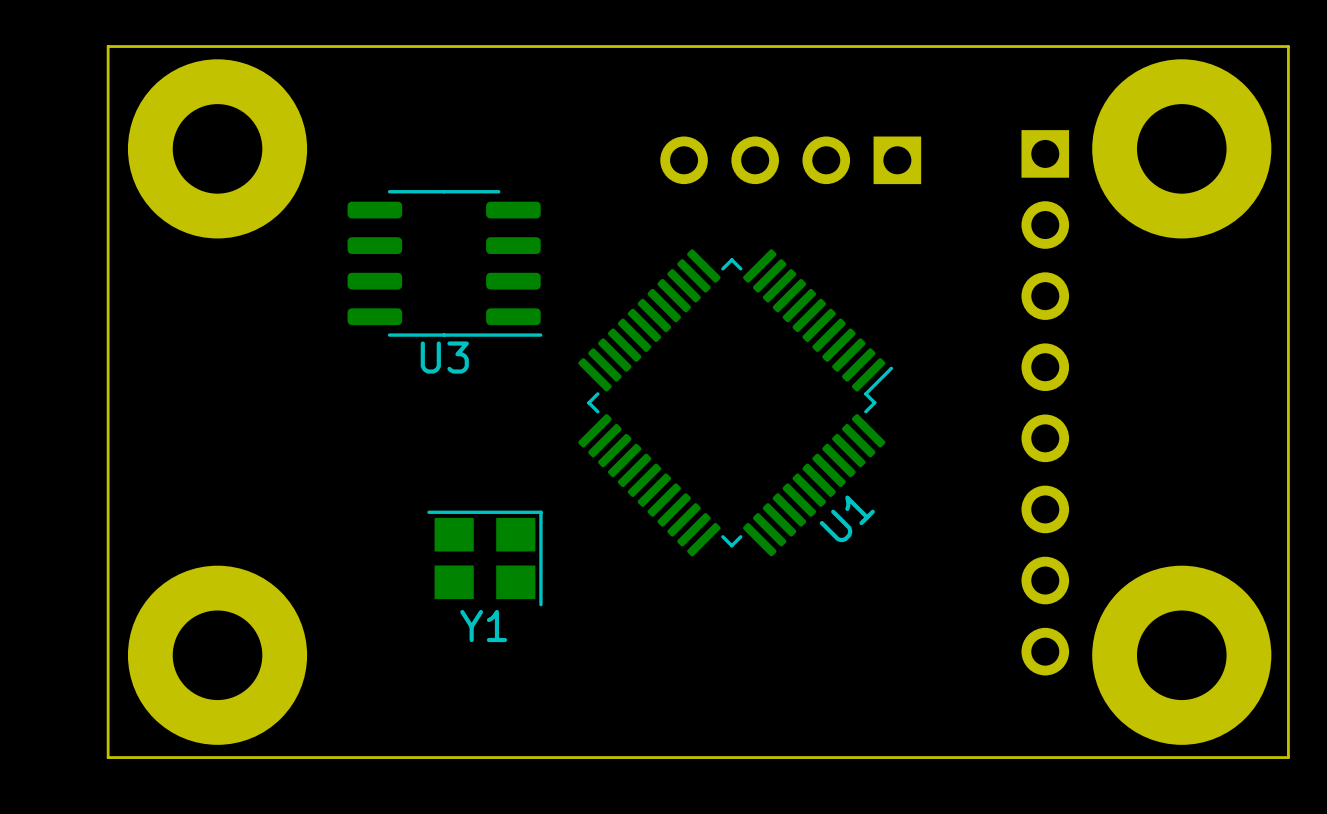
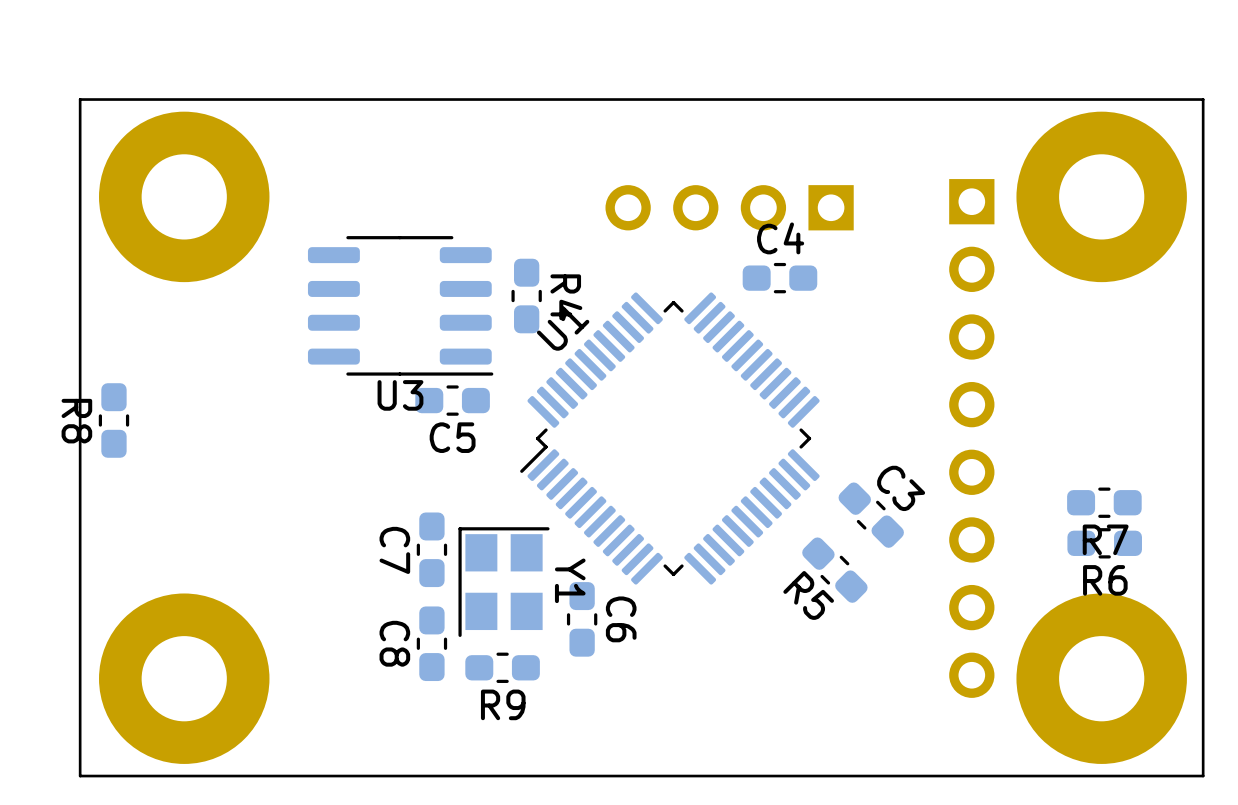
C4: none -> (779, 278)
R4: none -> (526, 296)
C5: none -> (452, 400)
R8: none -> (113, 420)
U1 rotation: 0° (735, 402) -> 180° (669, 438)
R7: none -> (1104, 502)
C3: none -> (871, 515)
R6: none -> (1104, 543)
C7: none -> (431, 549)
R5: none -> (834, 570)
Y1 rotation: 0° (484, 558) -> 90° counterclockwise (504, 582)
C6: none -> (582, 619)
C8: none -> (431, 643)
R9: none -> (502, 667)

